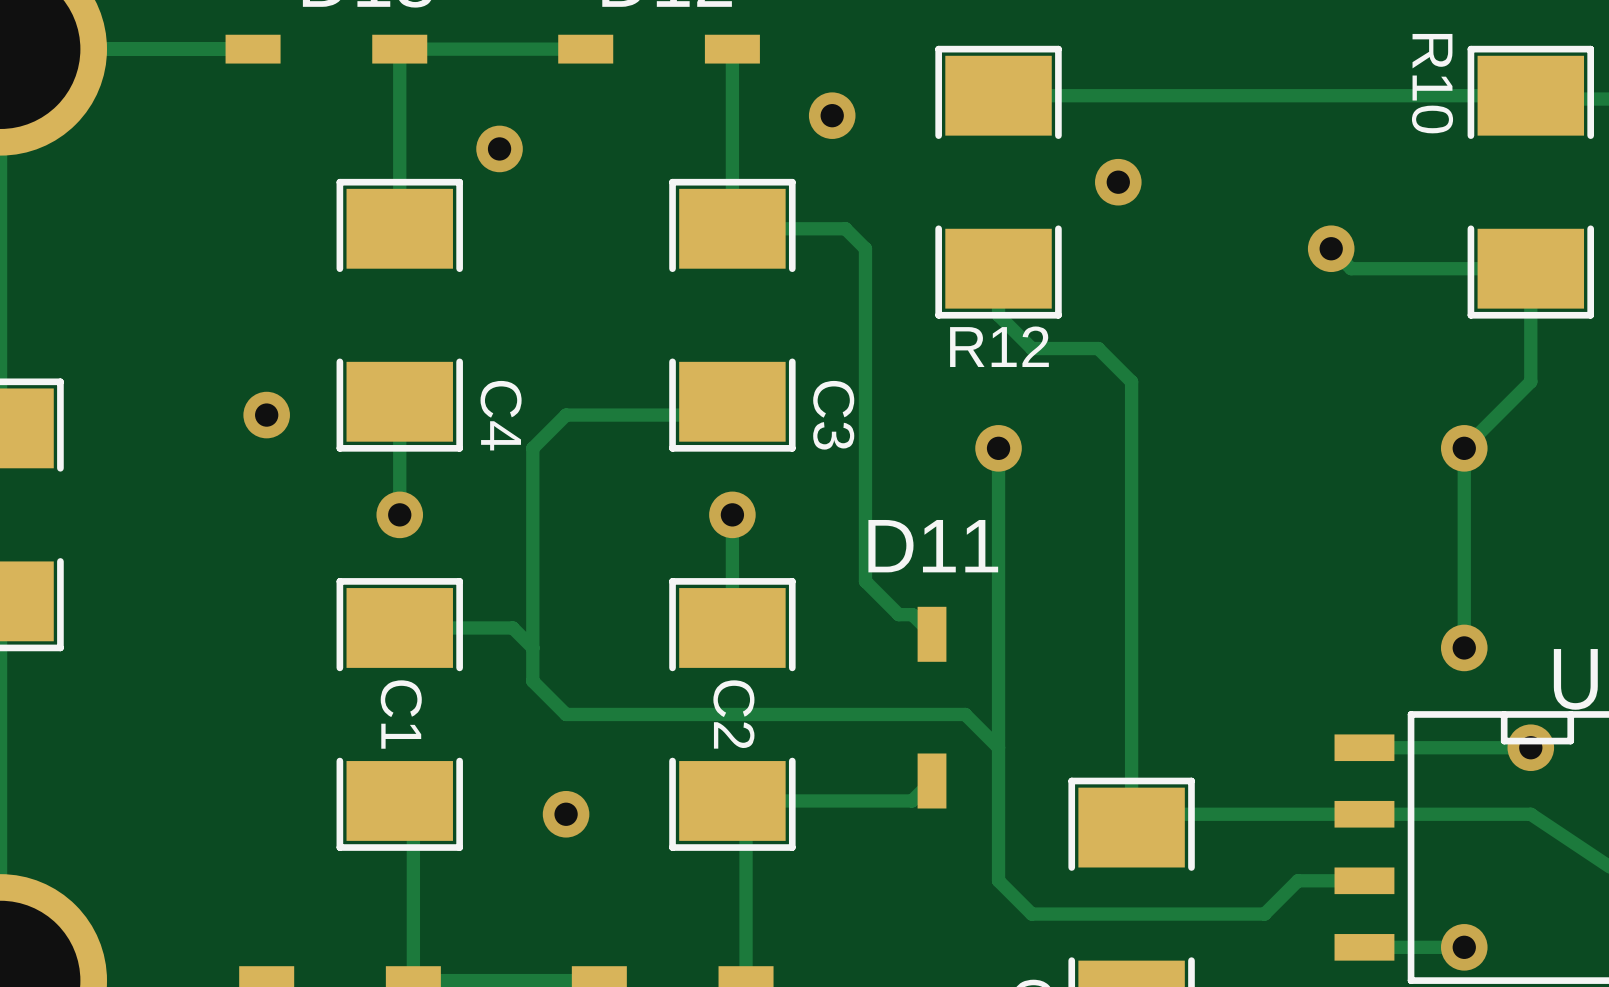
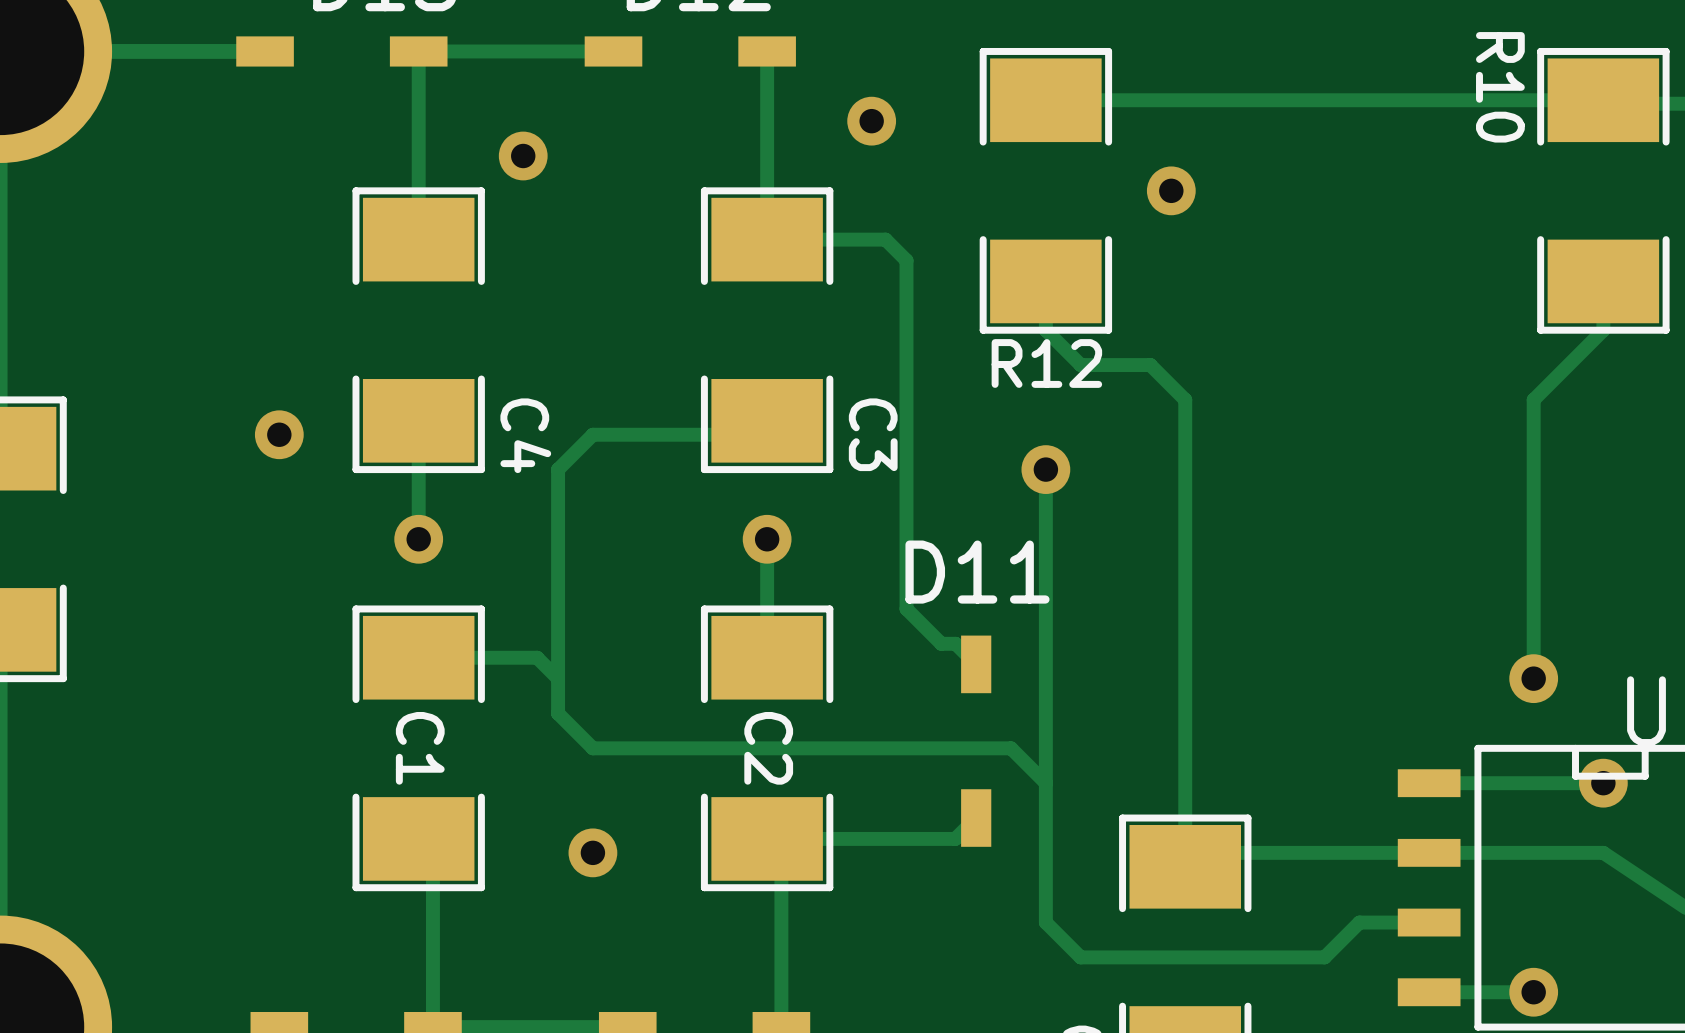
track: (1331, 248) (1351, 268) (1530, 268) -> none
via: (1331, 248) -> none
track: (1530, 315) (1530, 381) (1464, 448) -> (1603, 330) (1533, 399) (1533, 469)
via: (1464, 448) -> none

